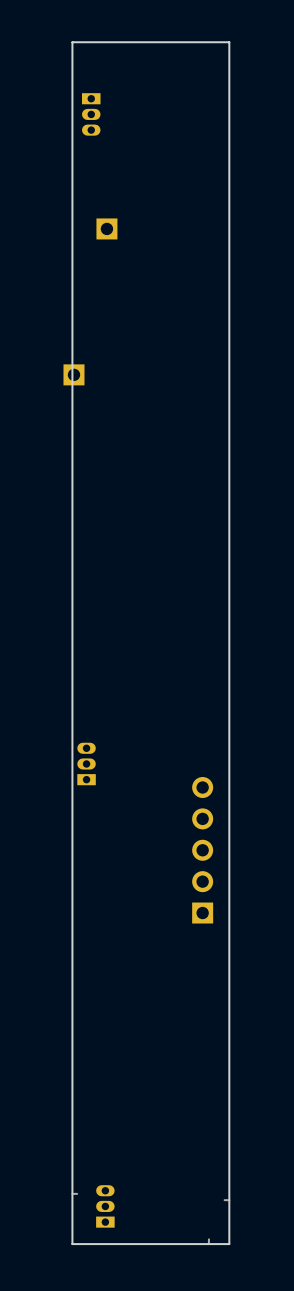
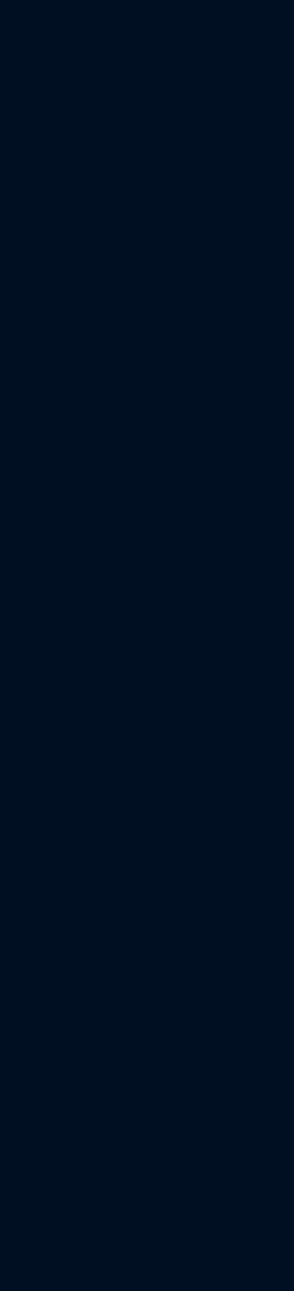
board edge: (229, 42) (72, 42) (72, 1244) (229, 1244) (229, 42) -> none
part: (91, 114) -> none
part: (106, 228) -> none
part: (73, 374) -> none
part: (86, 763) -> none
part: (202, 850) -> none
line: (77, 1193) (72, 1193) -> none
line: (229, 1200) (224, 1200) -> none
part: (105, 1206) -> none
line: (208, 1239) (208, 1244) -> none

